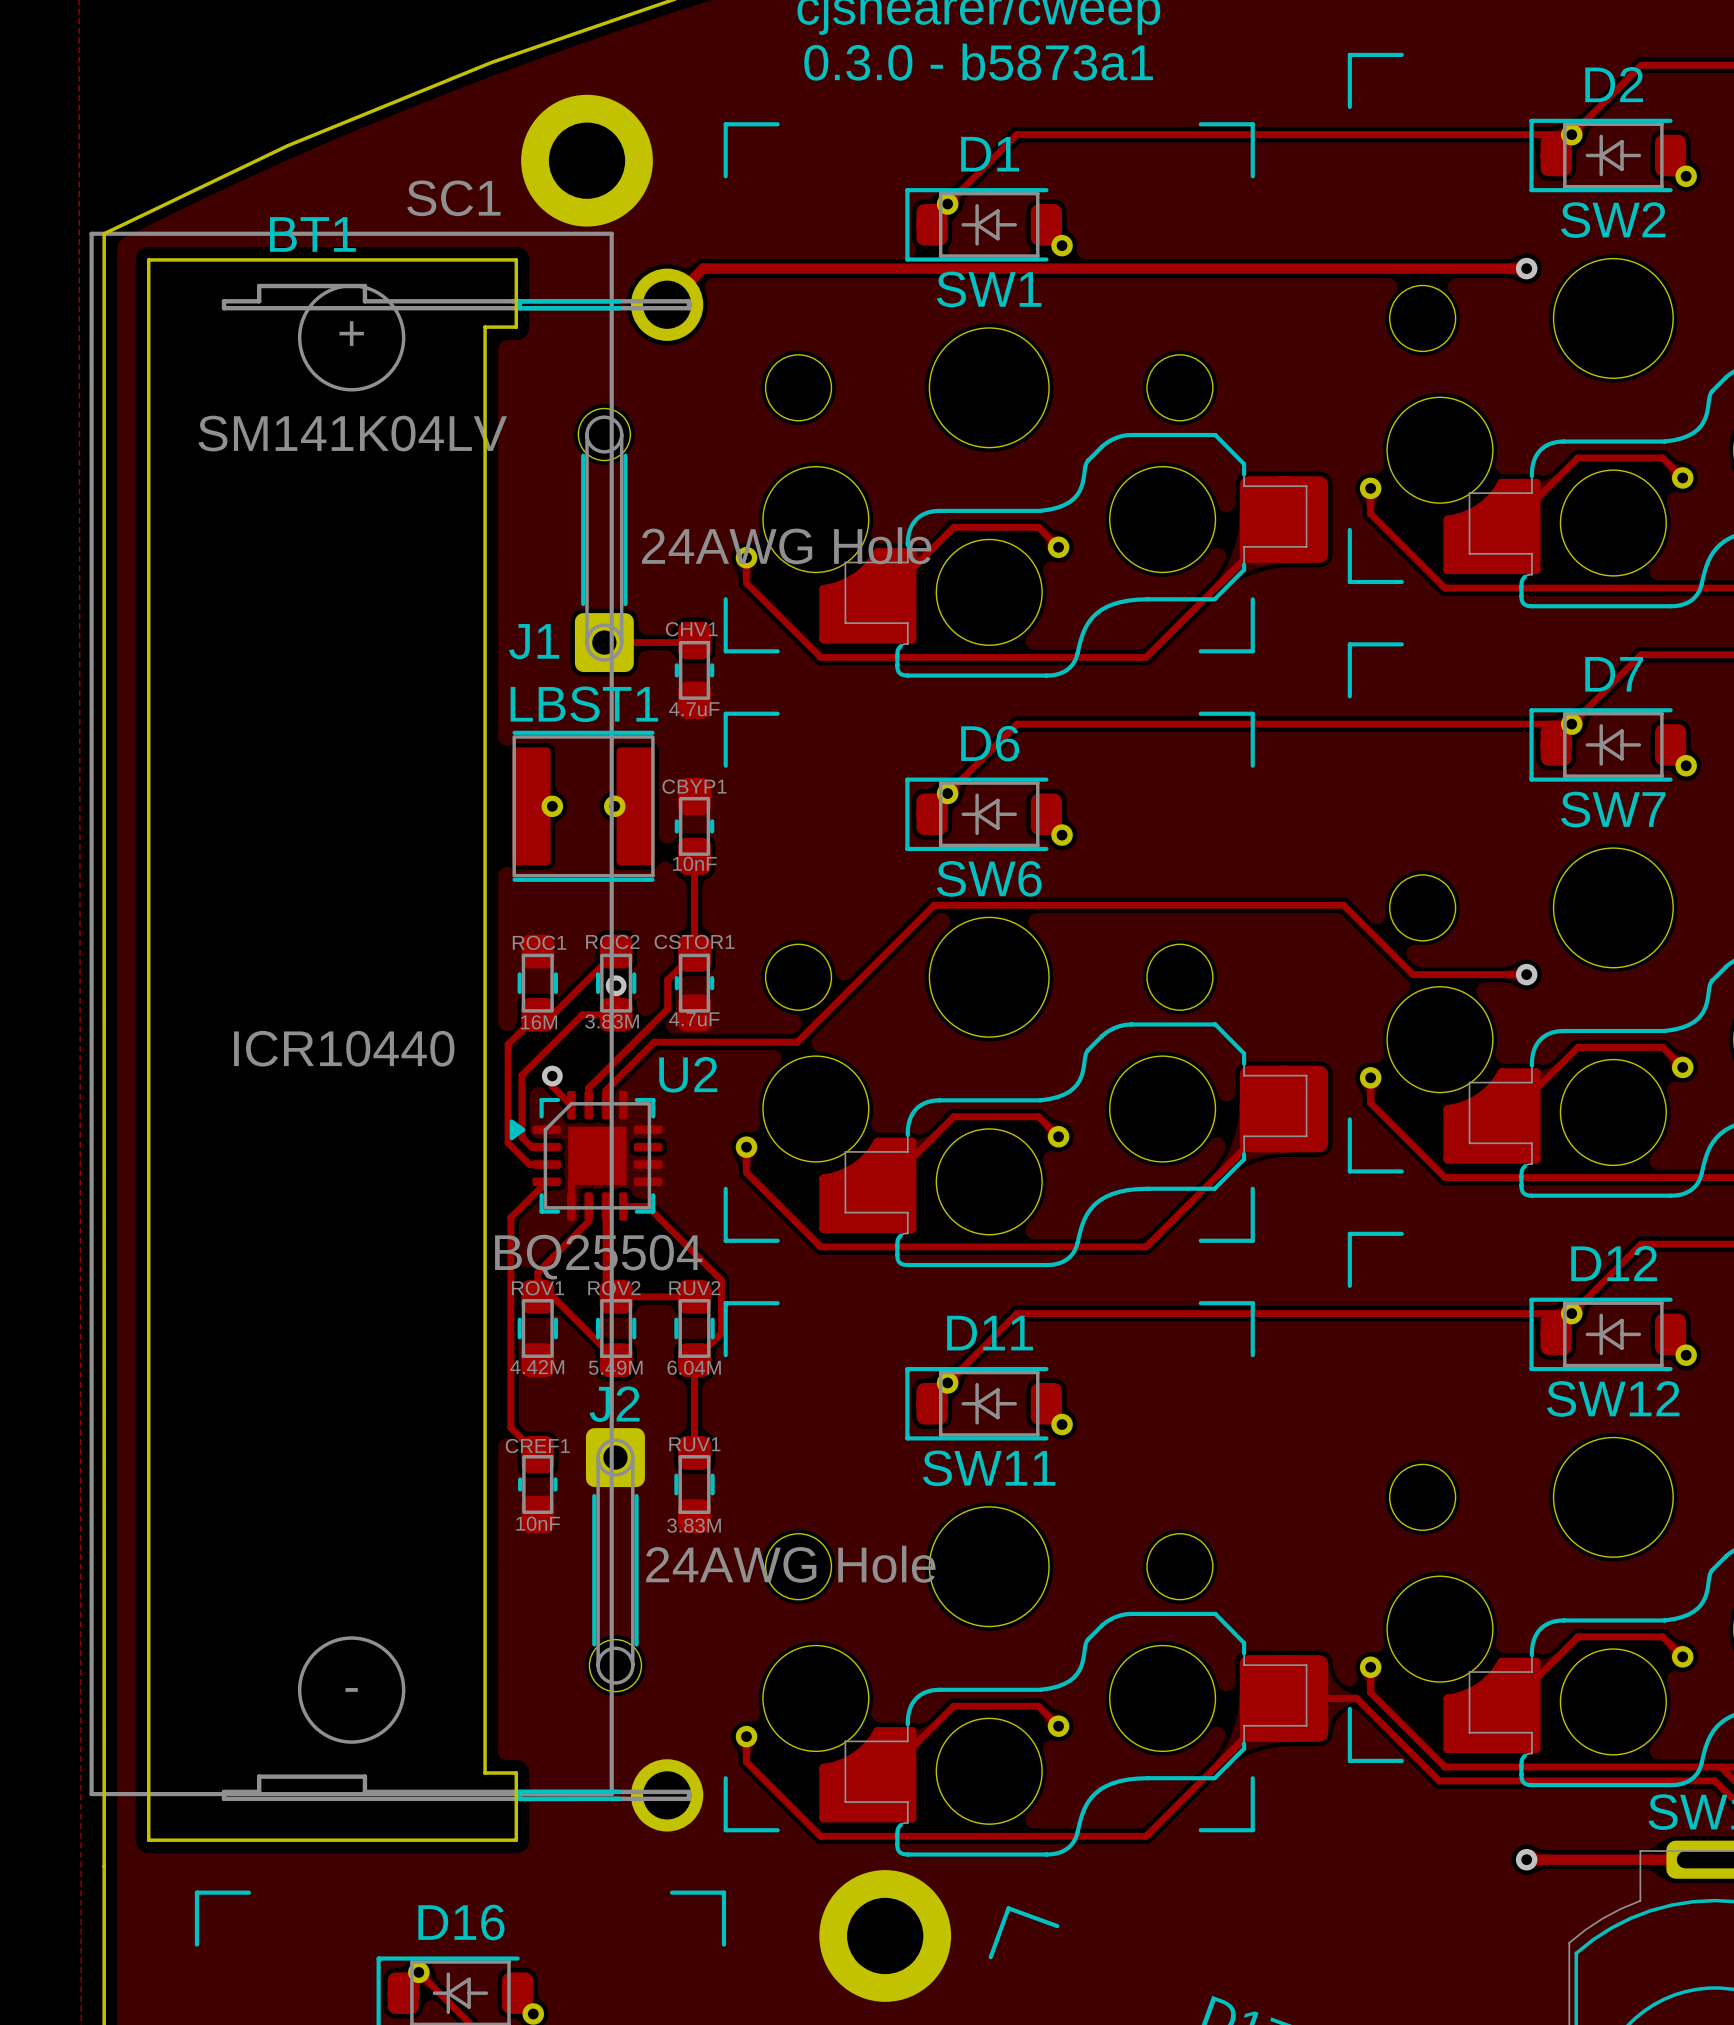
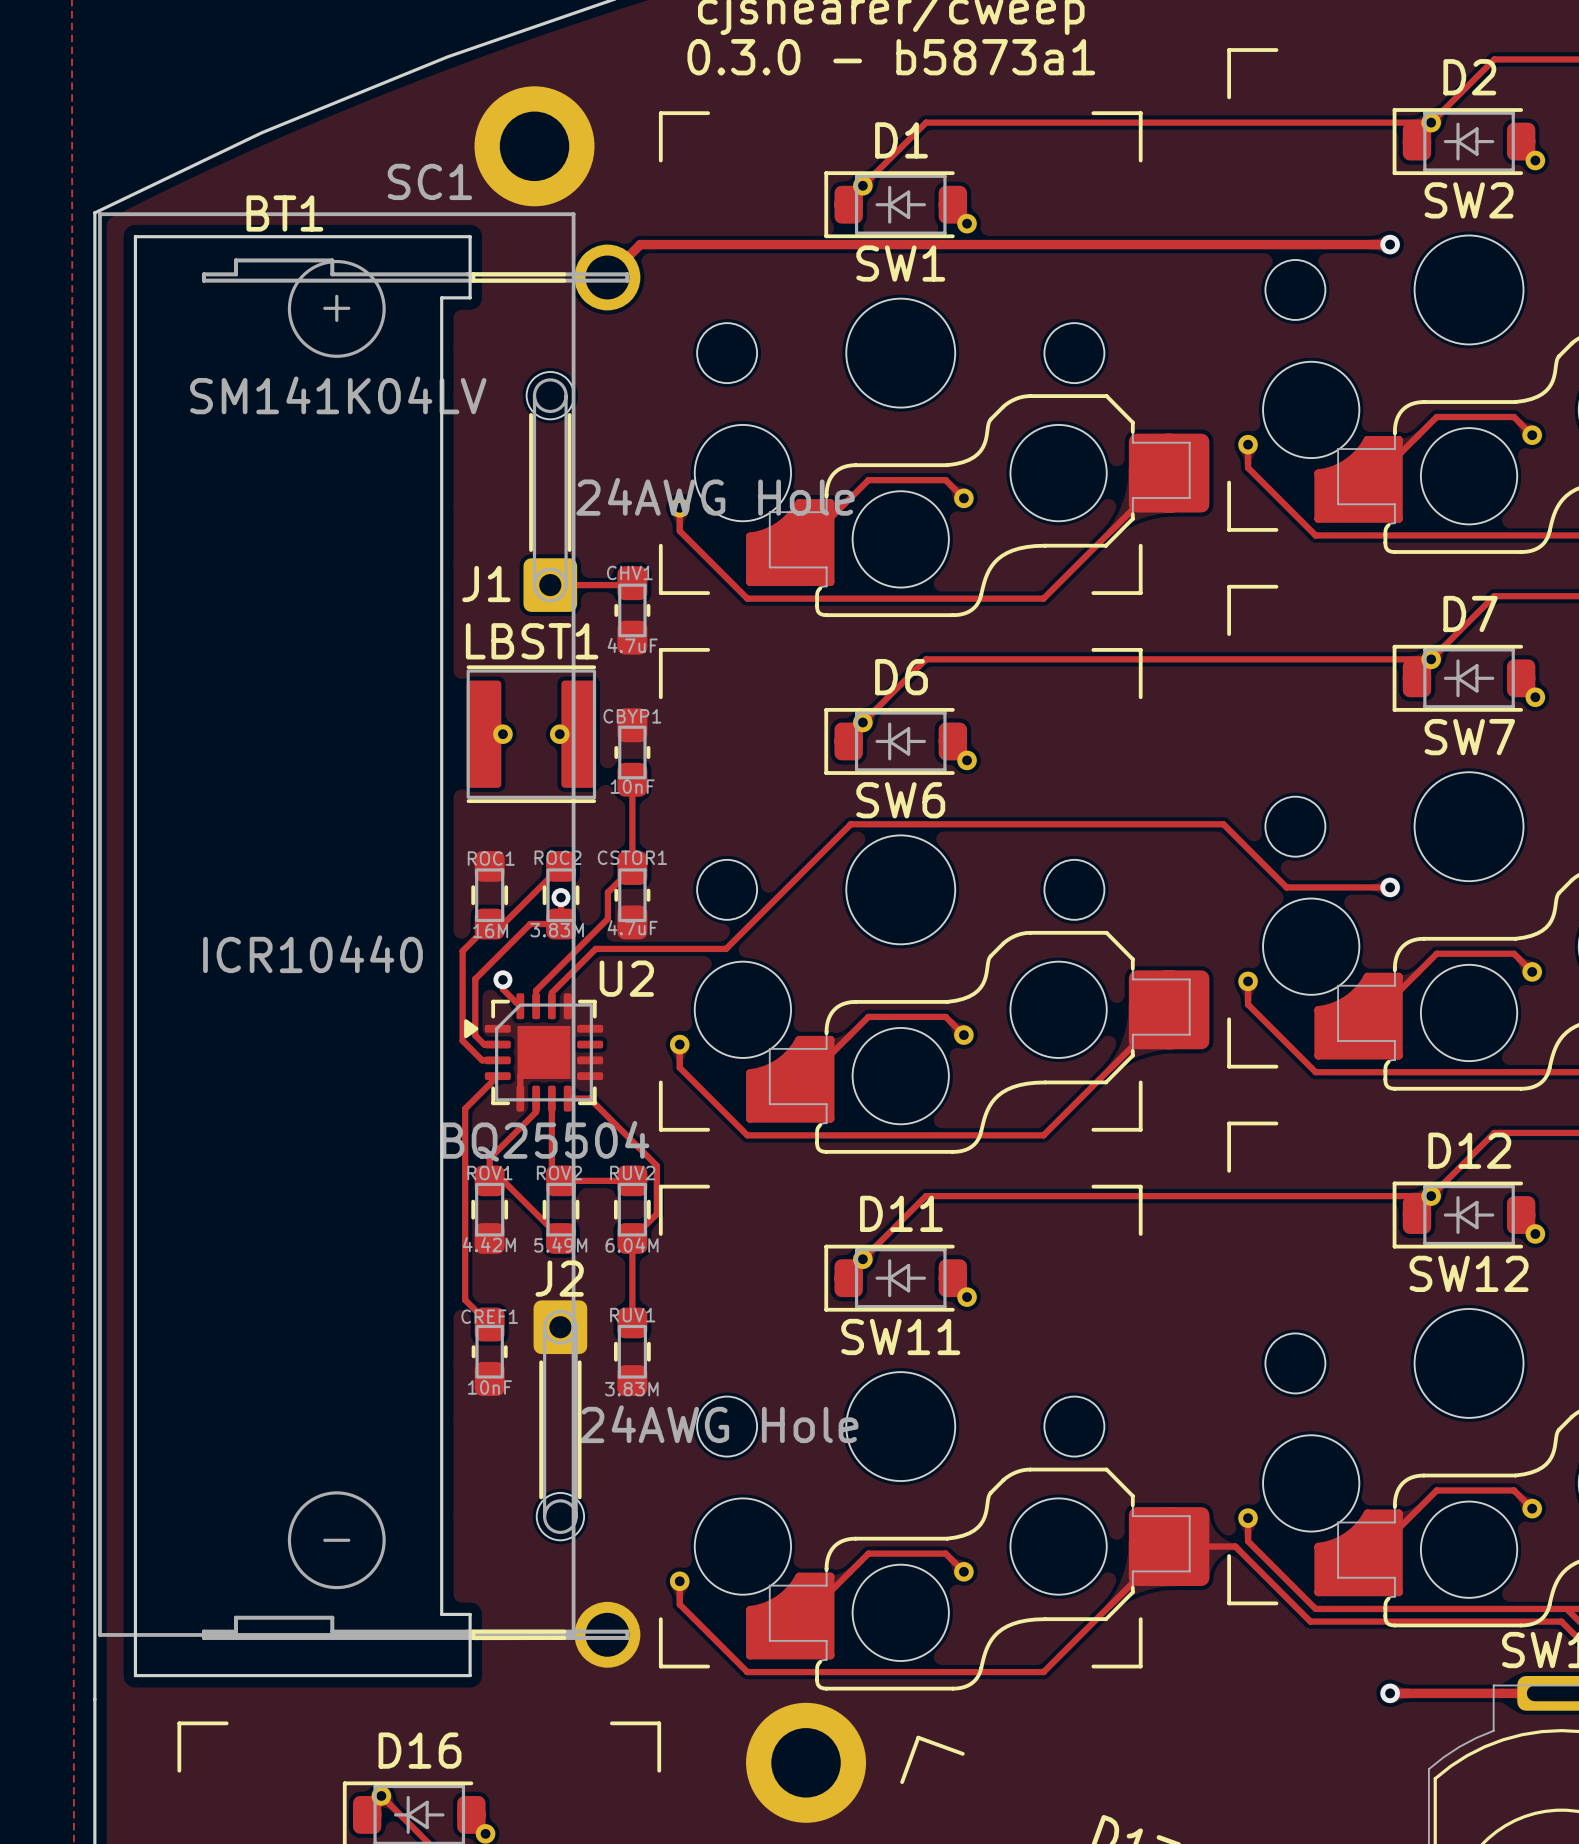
SC1 position: (351, 1013) -> (336, 924)

